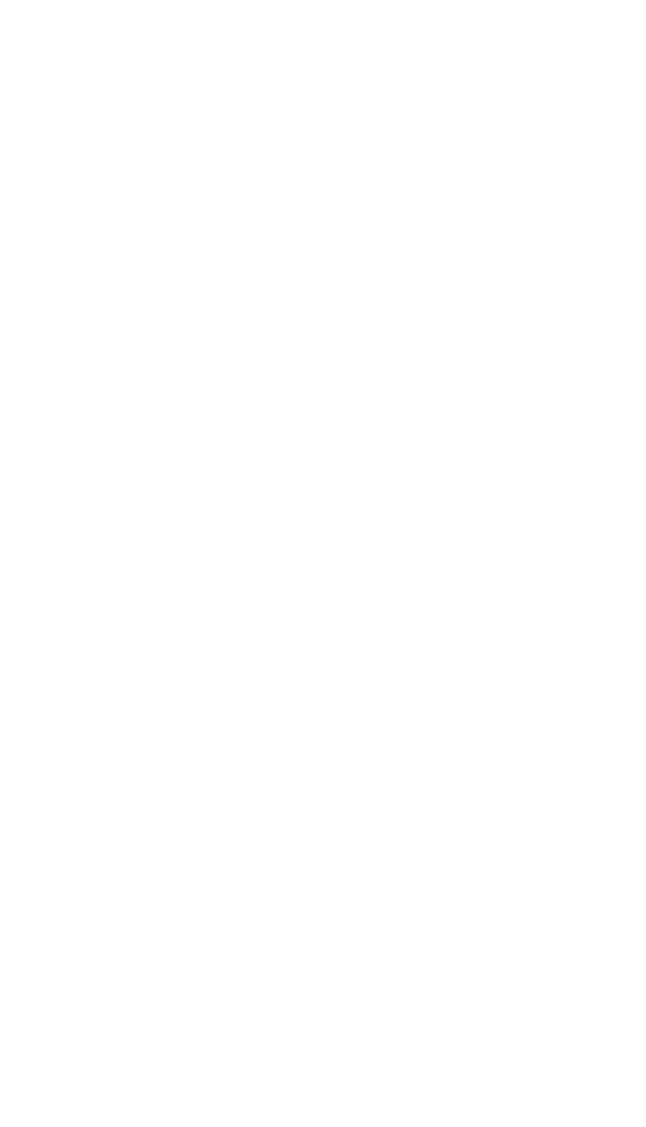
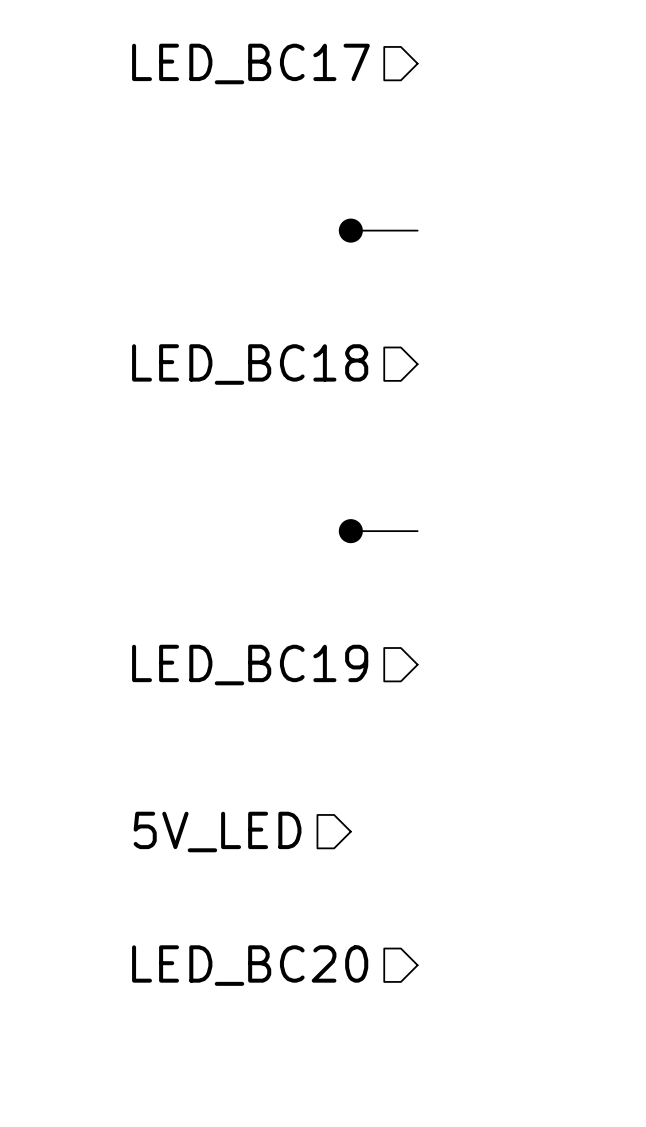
hierarchical label: none -> LED_BC17 (250, 63)
wire: none -> (350, 230) (417, 230)
junction: none -> (350, 230)
hierarchical label: none -> LED_BC18 (250, 364)
wire: none -> (350, 531) (417, 531)
junction: none -> (350, 531)
hierarchical label: none -> LED_BC19 (250, 665)
hierarchical label: none -> 5V_LED (217, 832)
hierarchical label: none -> LED_BC20 (250, 965)

